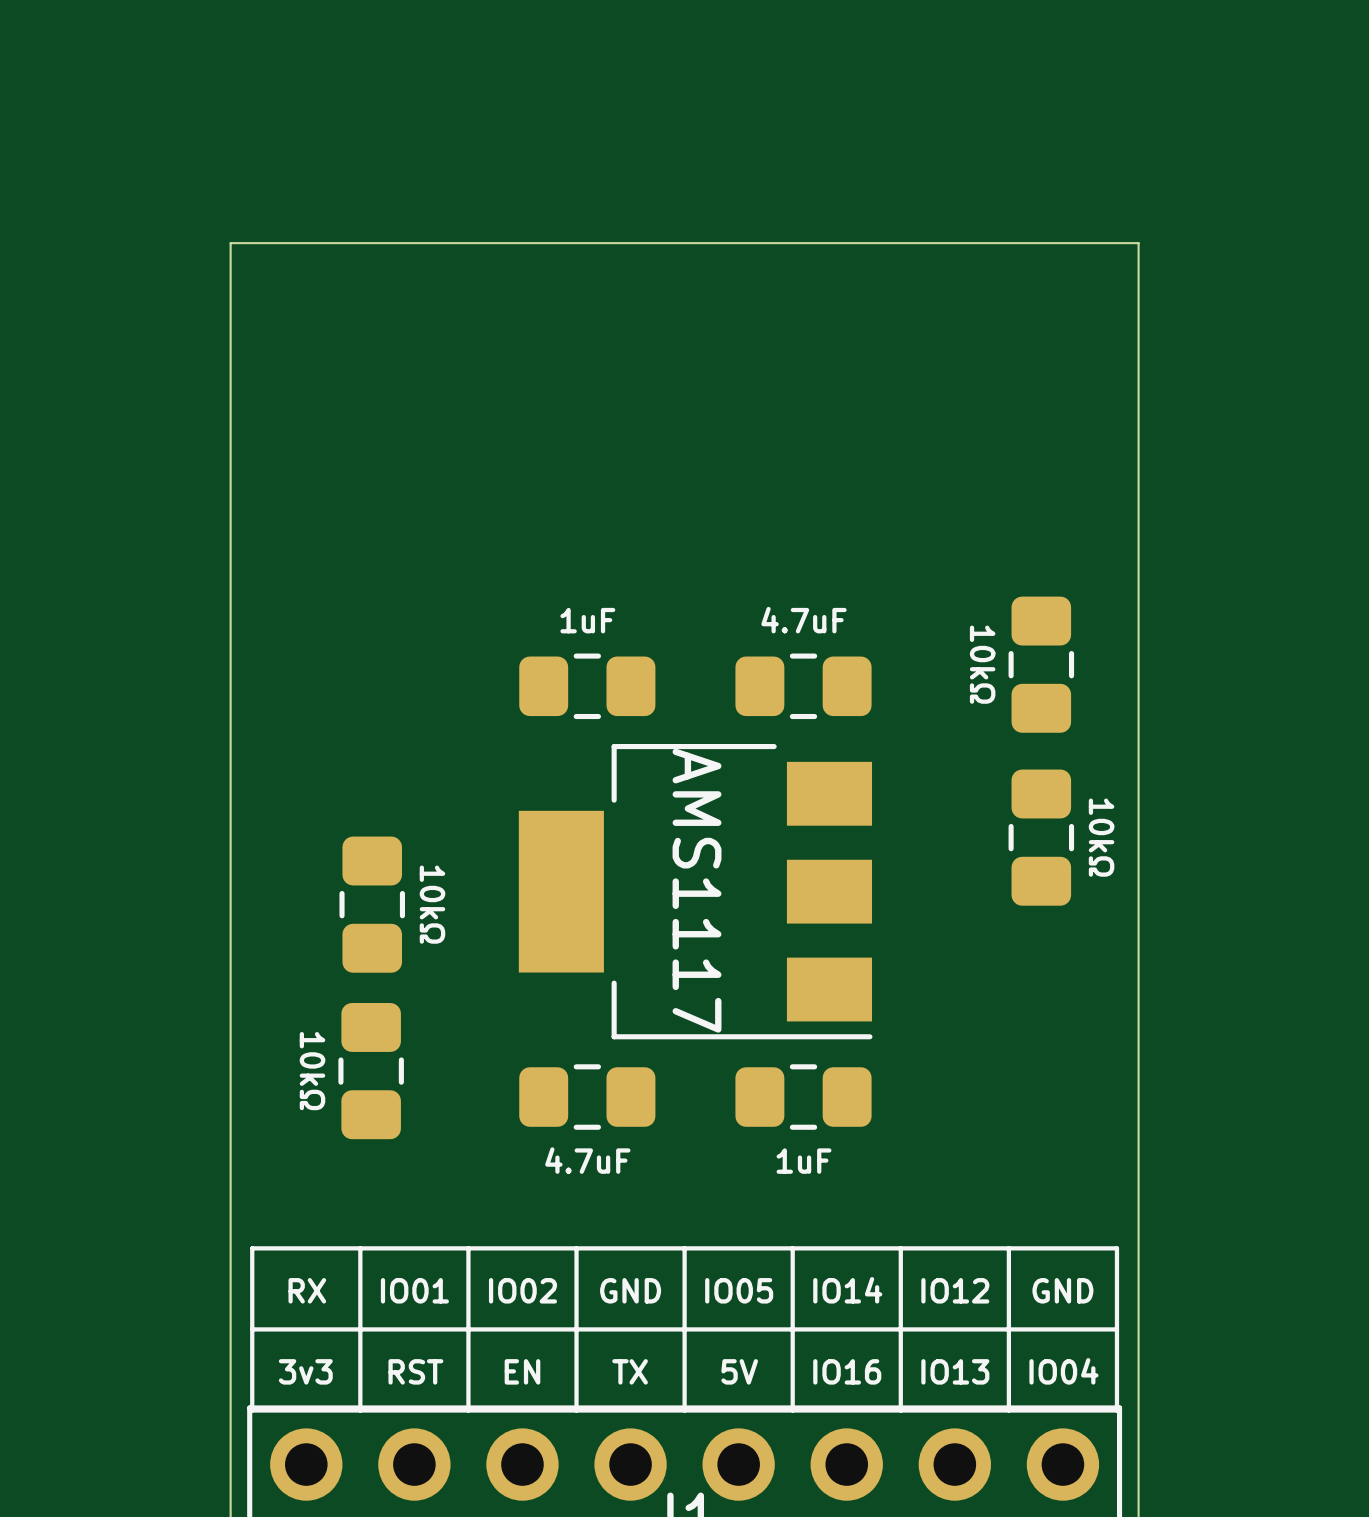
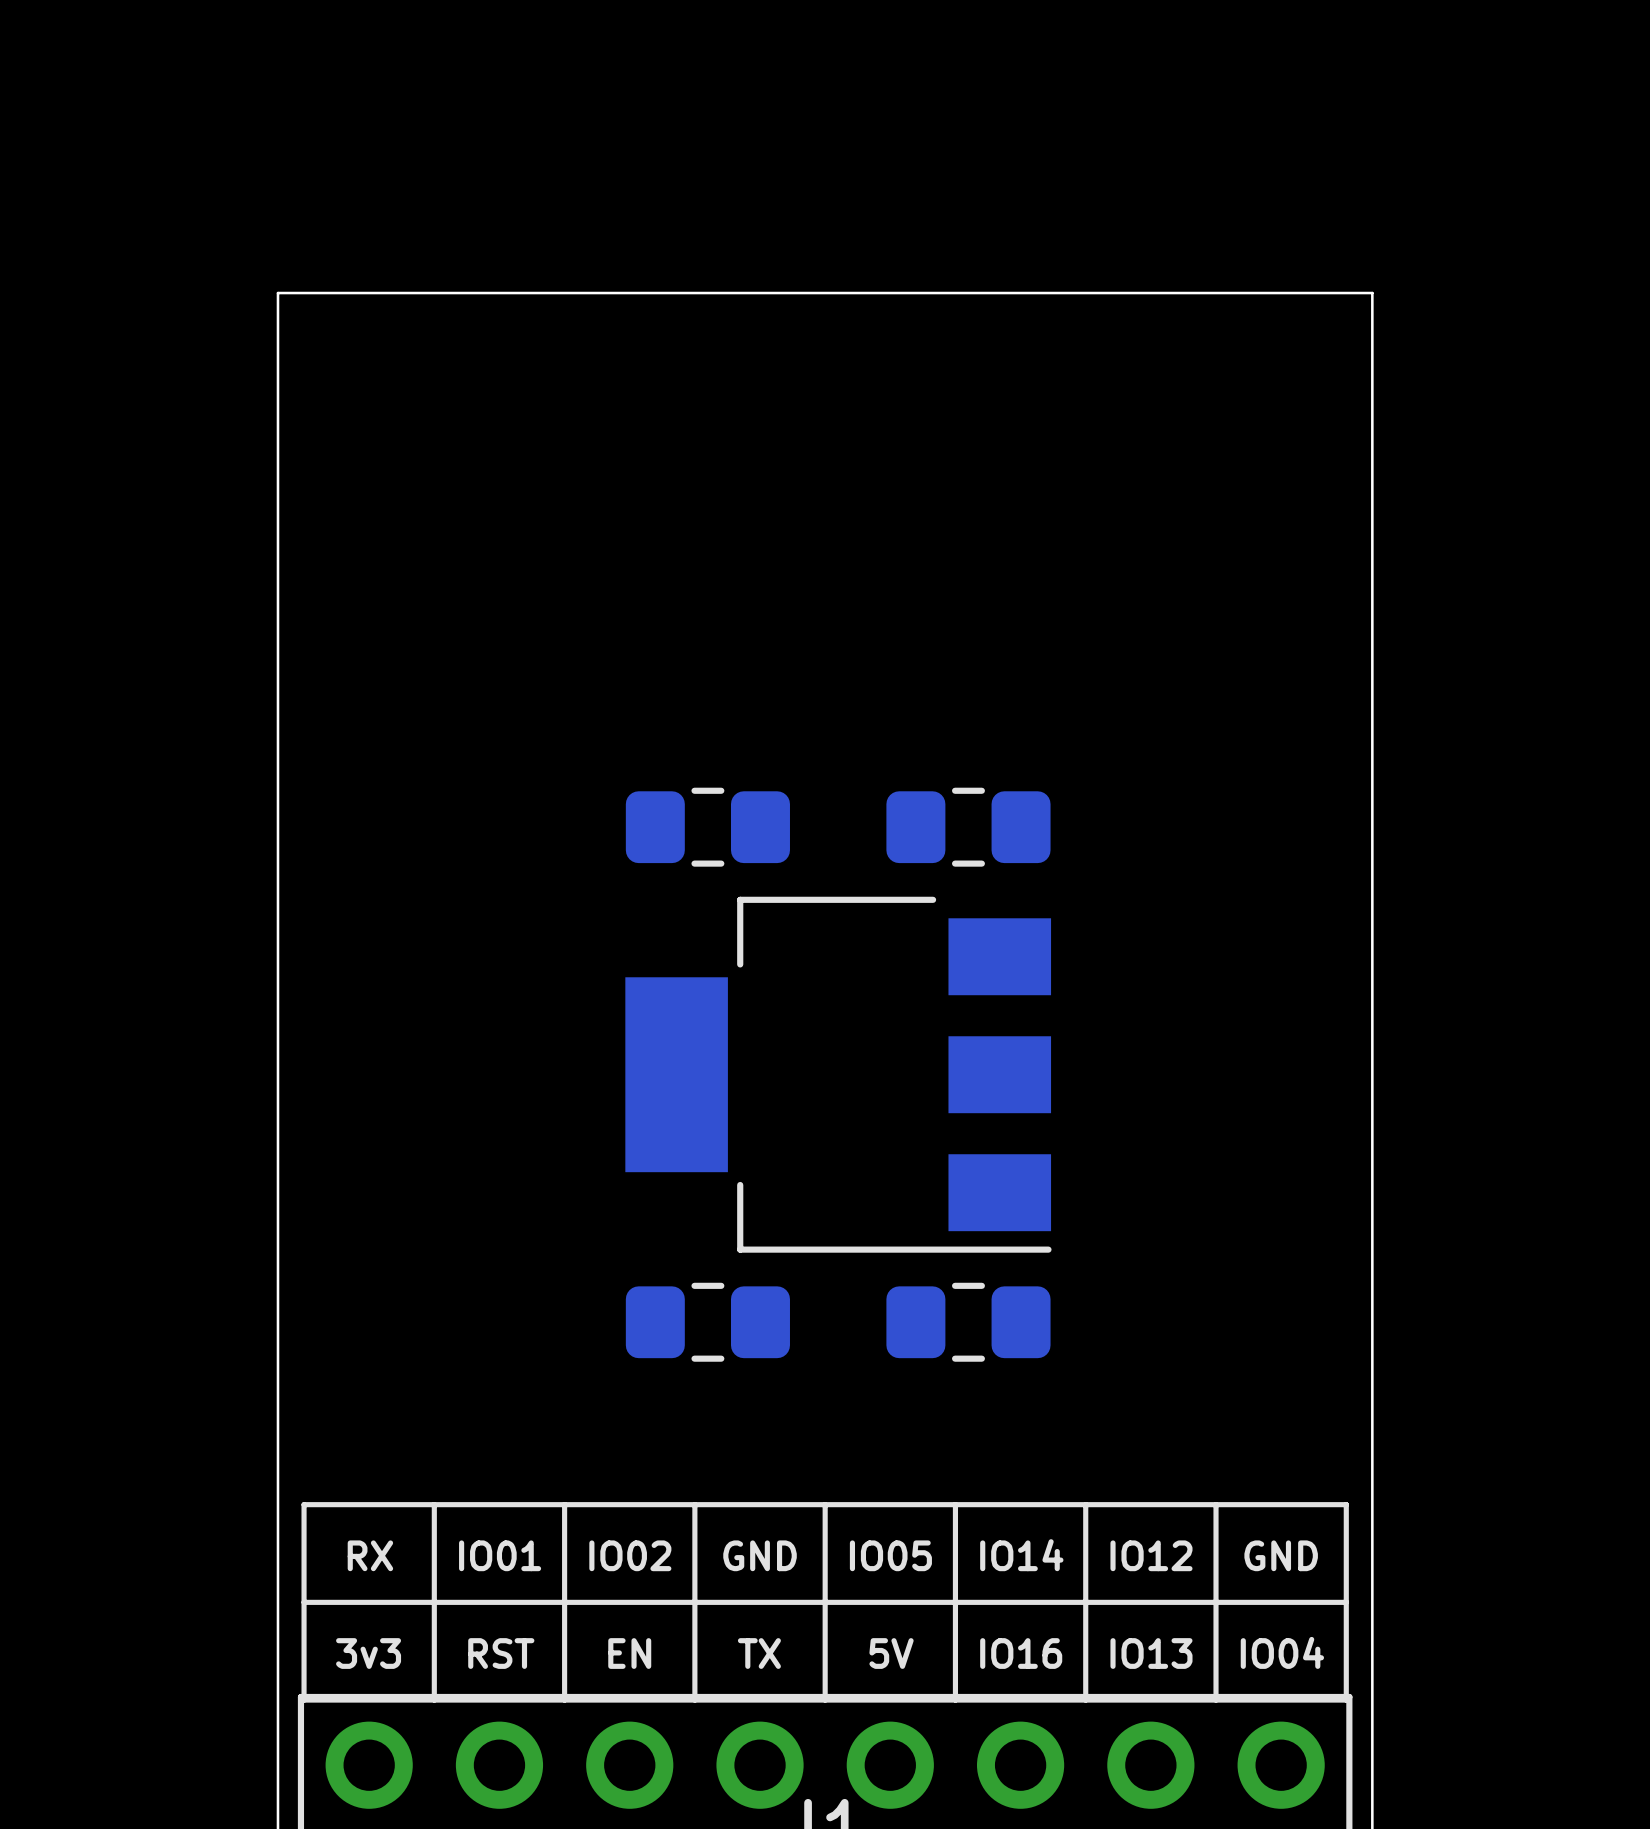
part value: 1uF (587, 620) -> none
part value: 4.7uF (804, 620) -> none
part: 10kΩ (1041, 664) -> none
part: 10kΩ (1041, 837) -> none
part value: AMS1117 (697, 890) -> none
part: 10kΩ (372, 904) -> none
part: 10kΩ (371, 1071) -> none
part value: 4.7uF (587, 1160) -> none
part value: 1uF (804, 1161) -> none

